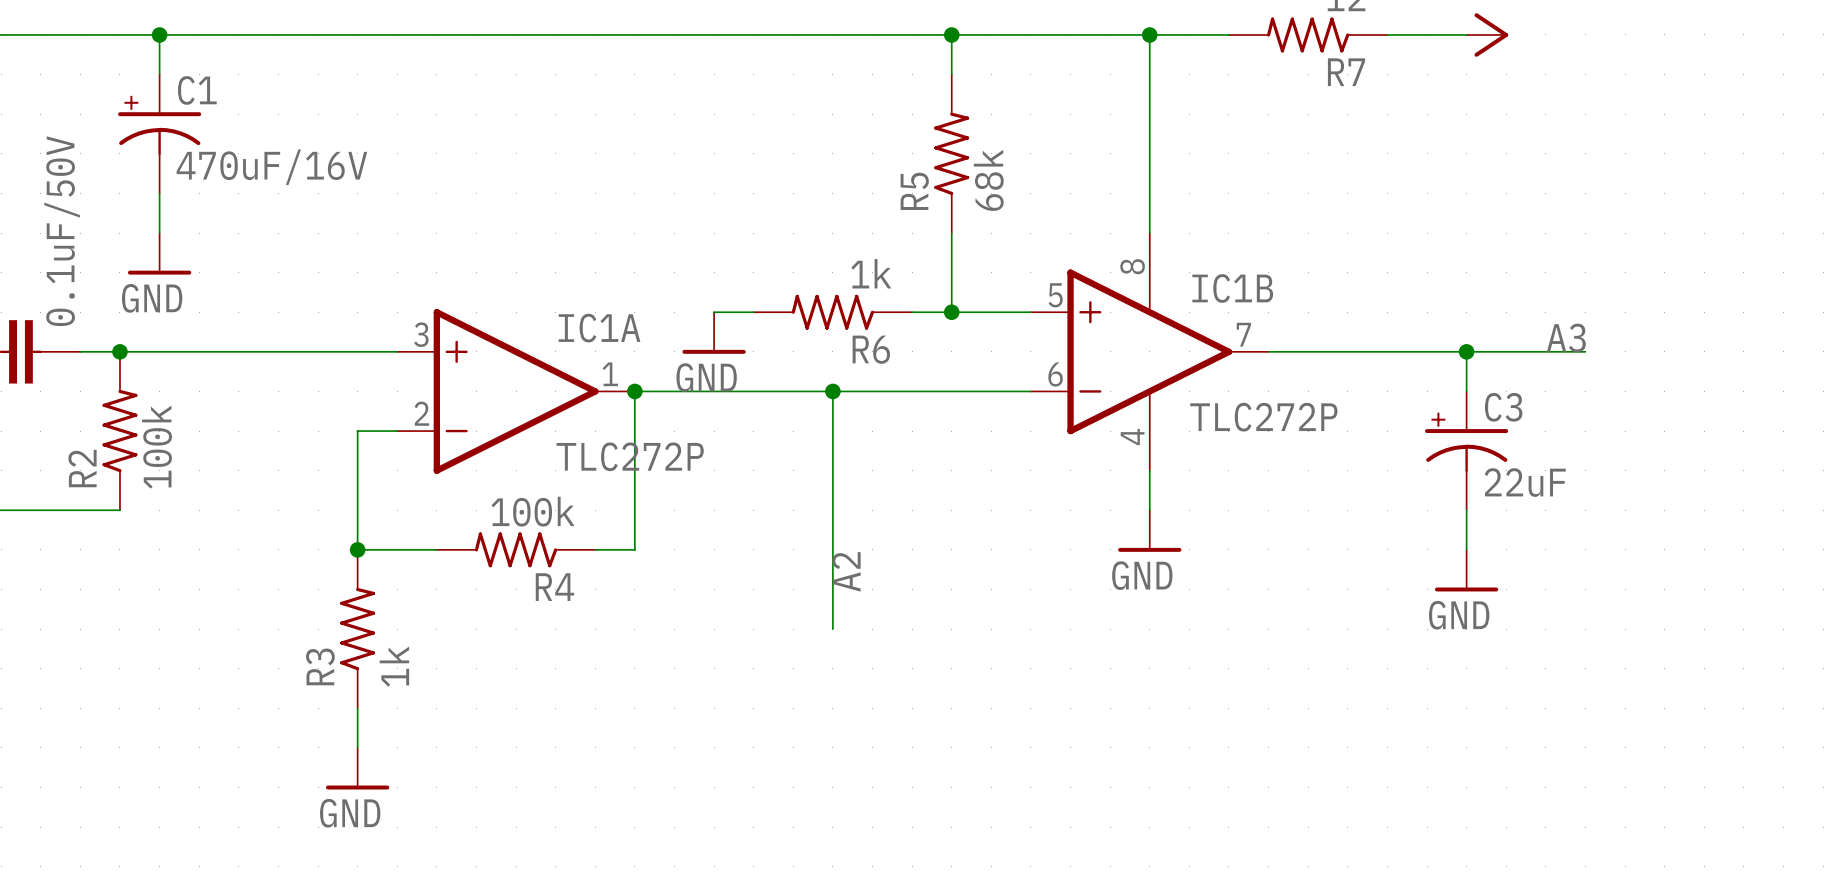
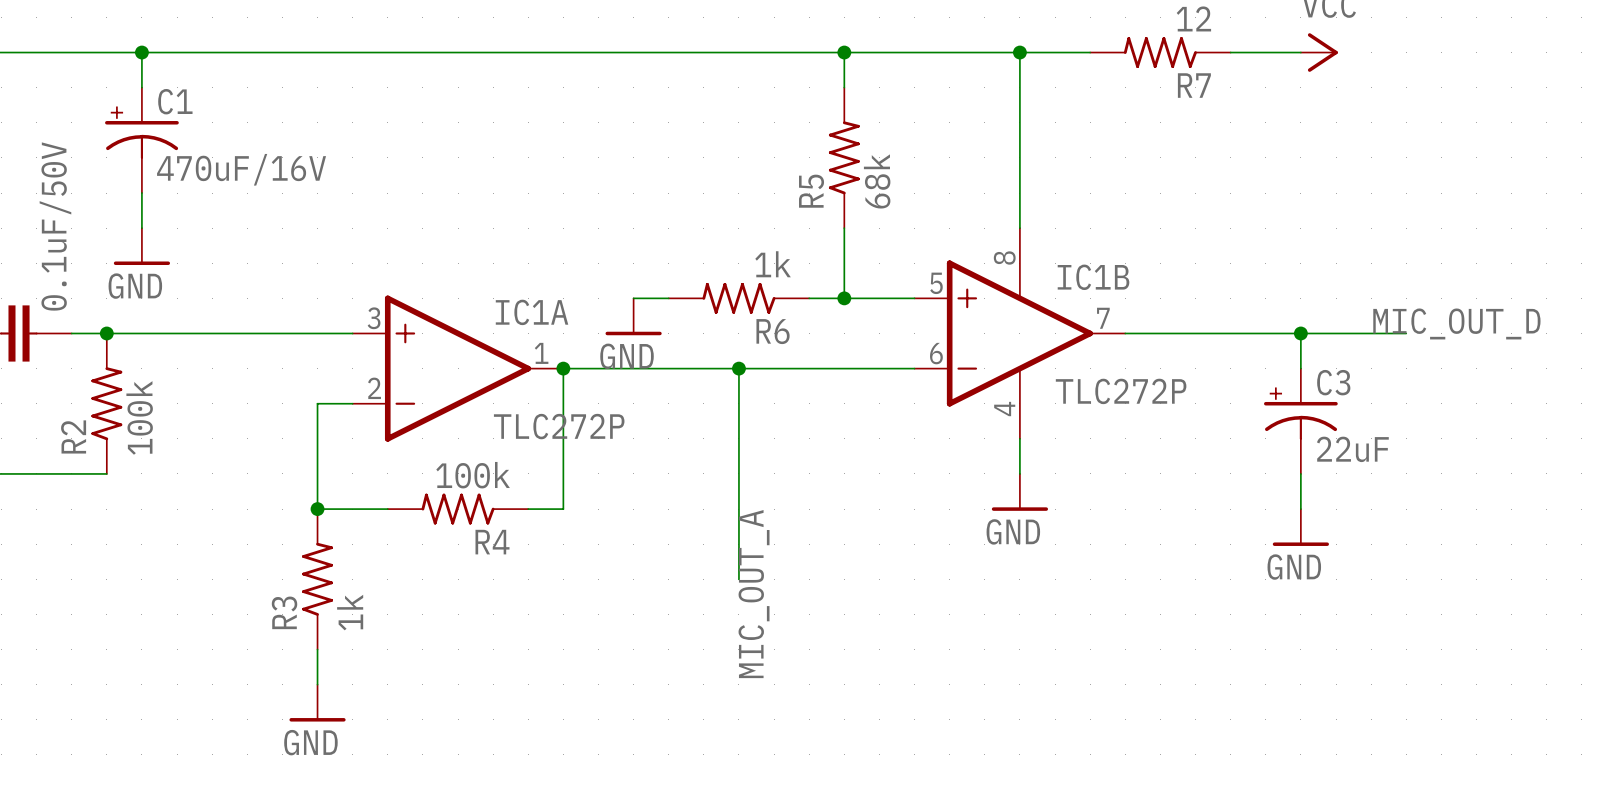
label: A3 (1566, 337) -> MIC_OUT_D (1456, 323)
label: A2 (846, 571) -> MIC_OUT_A (754, 594)

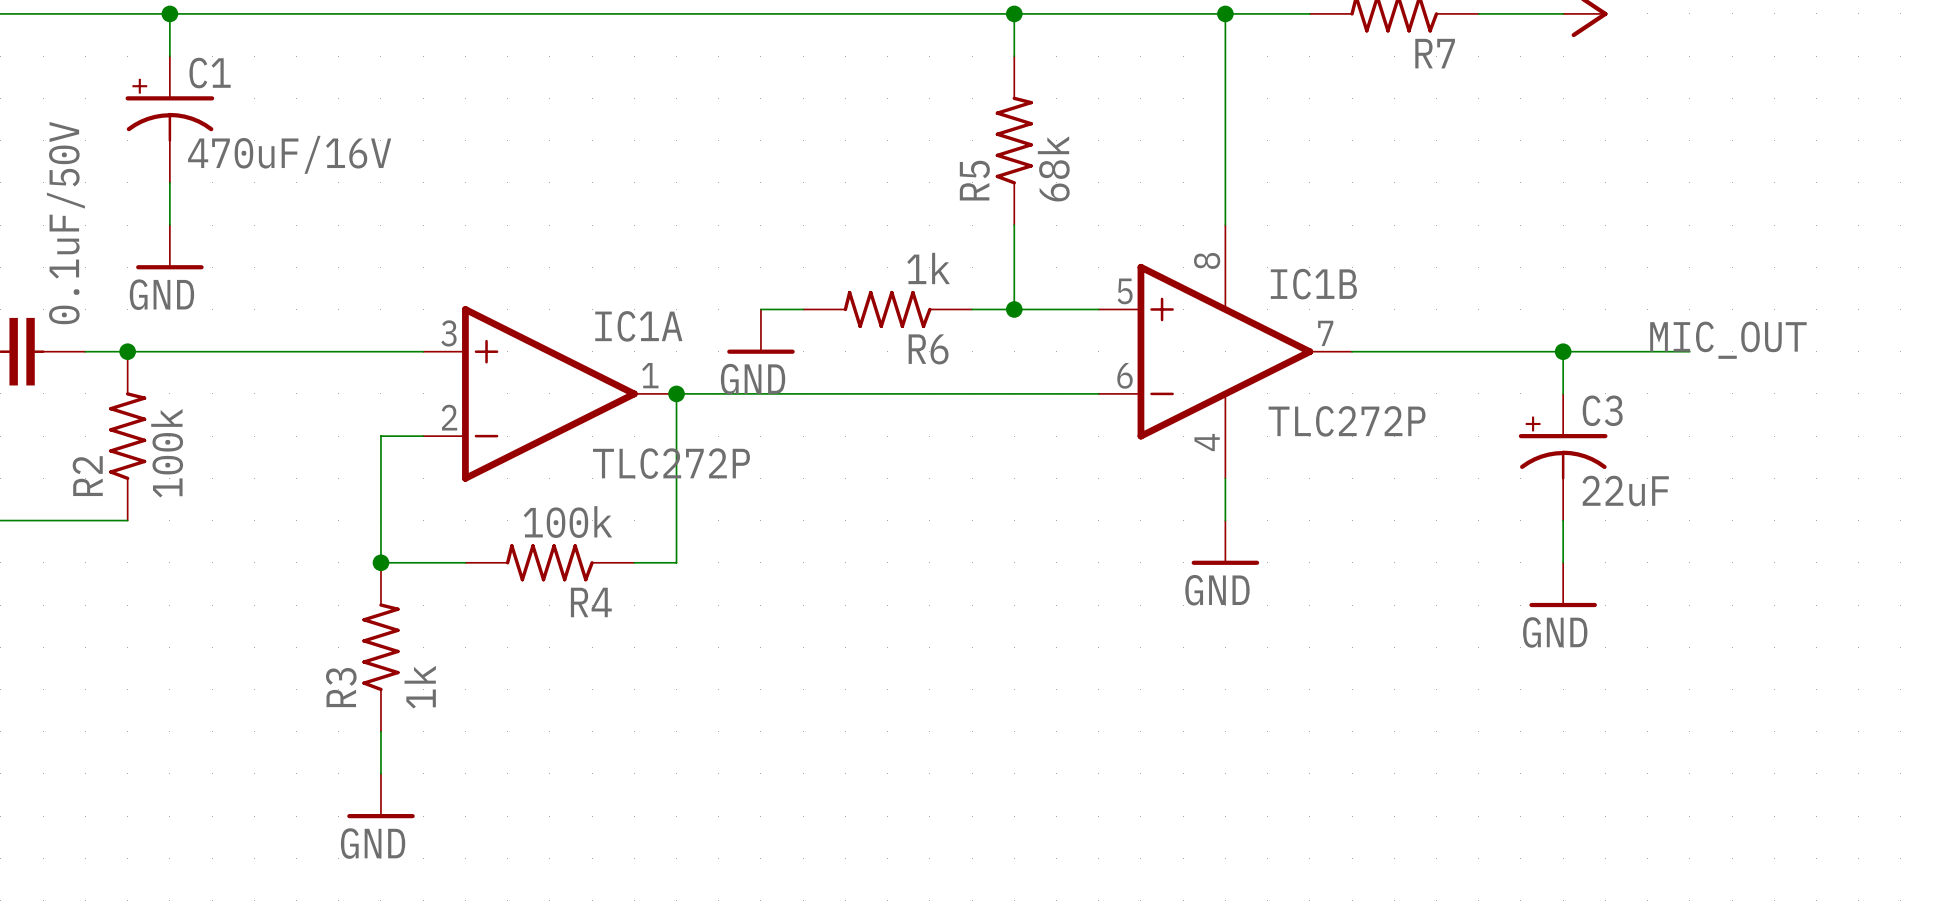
label: MIC_OUT_D (1456, 323) -> MIC_OUT (1728, 340)
wire: (738, 368) (738, 579) -> none
junction: (738, 368) -> none
label: MIC_OUT_A (754, 594) -> none

